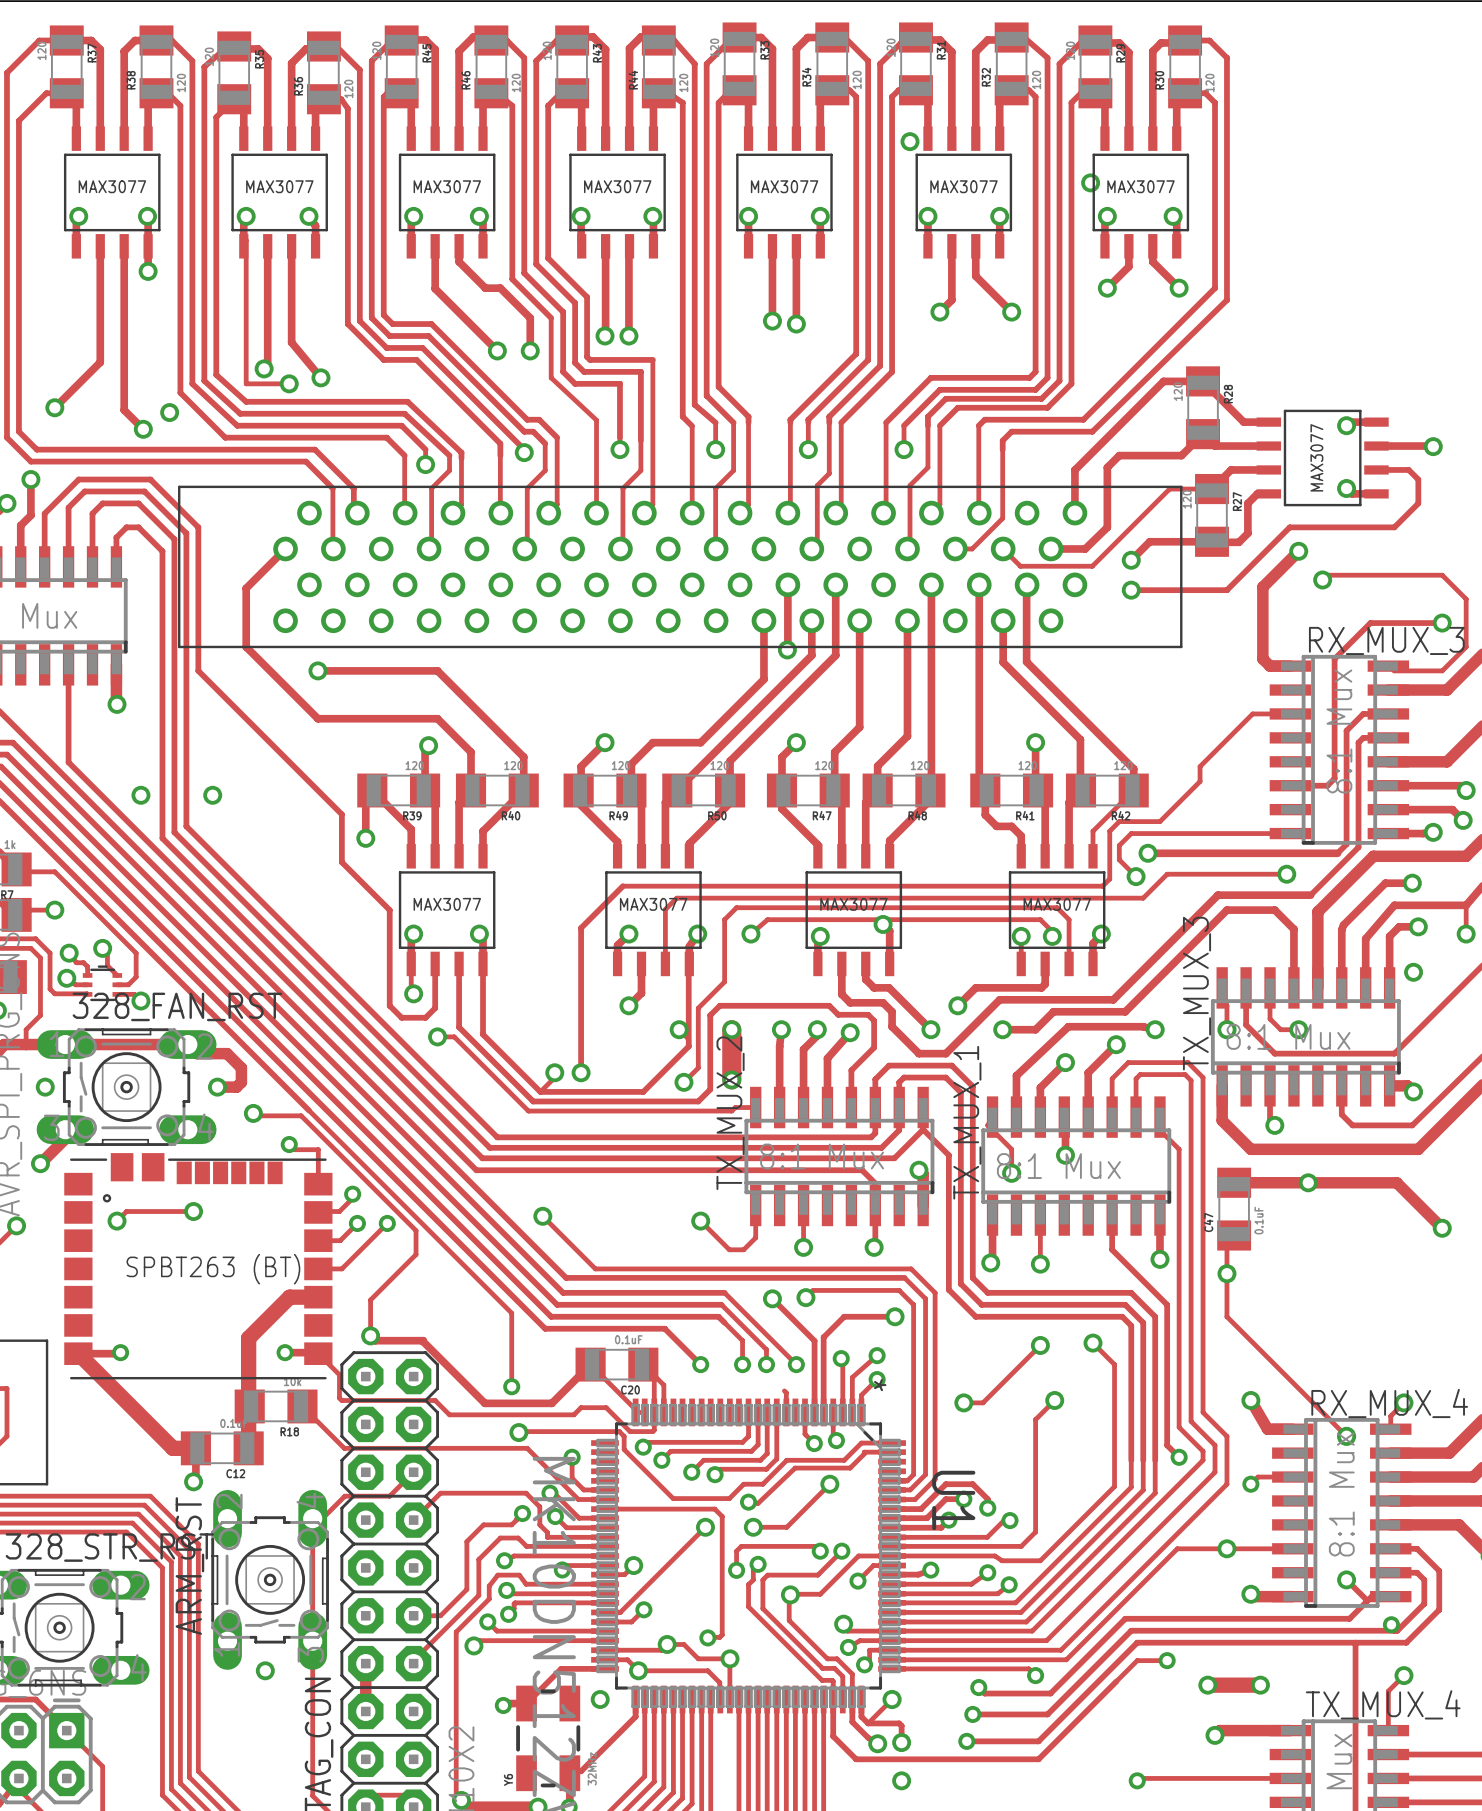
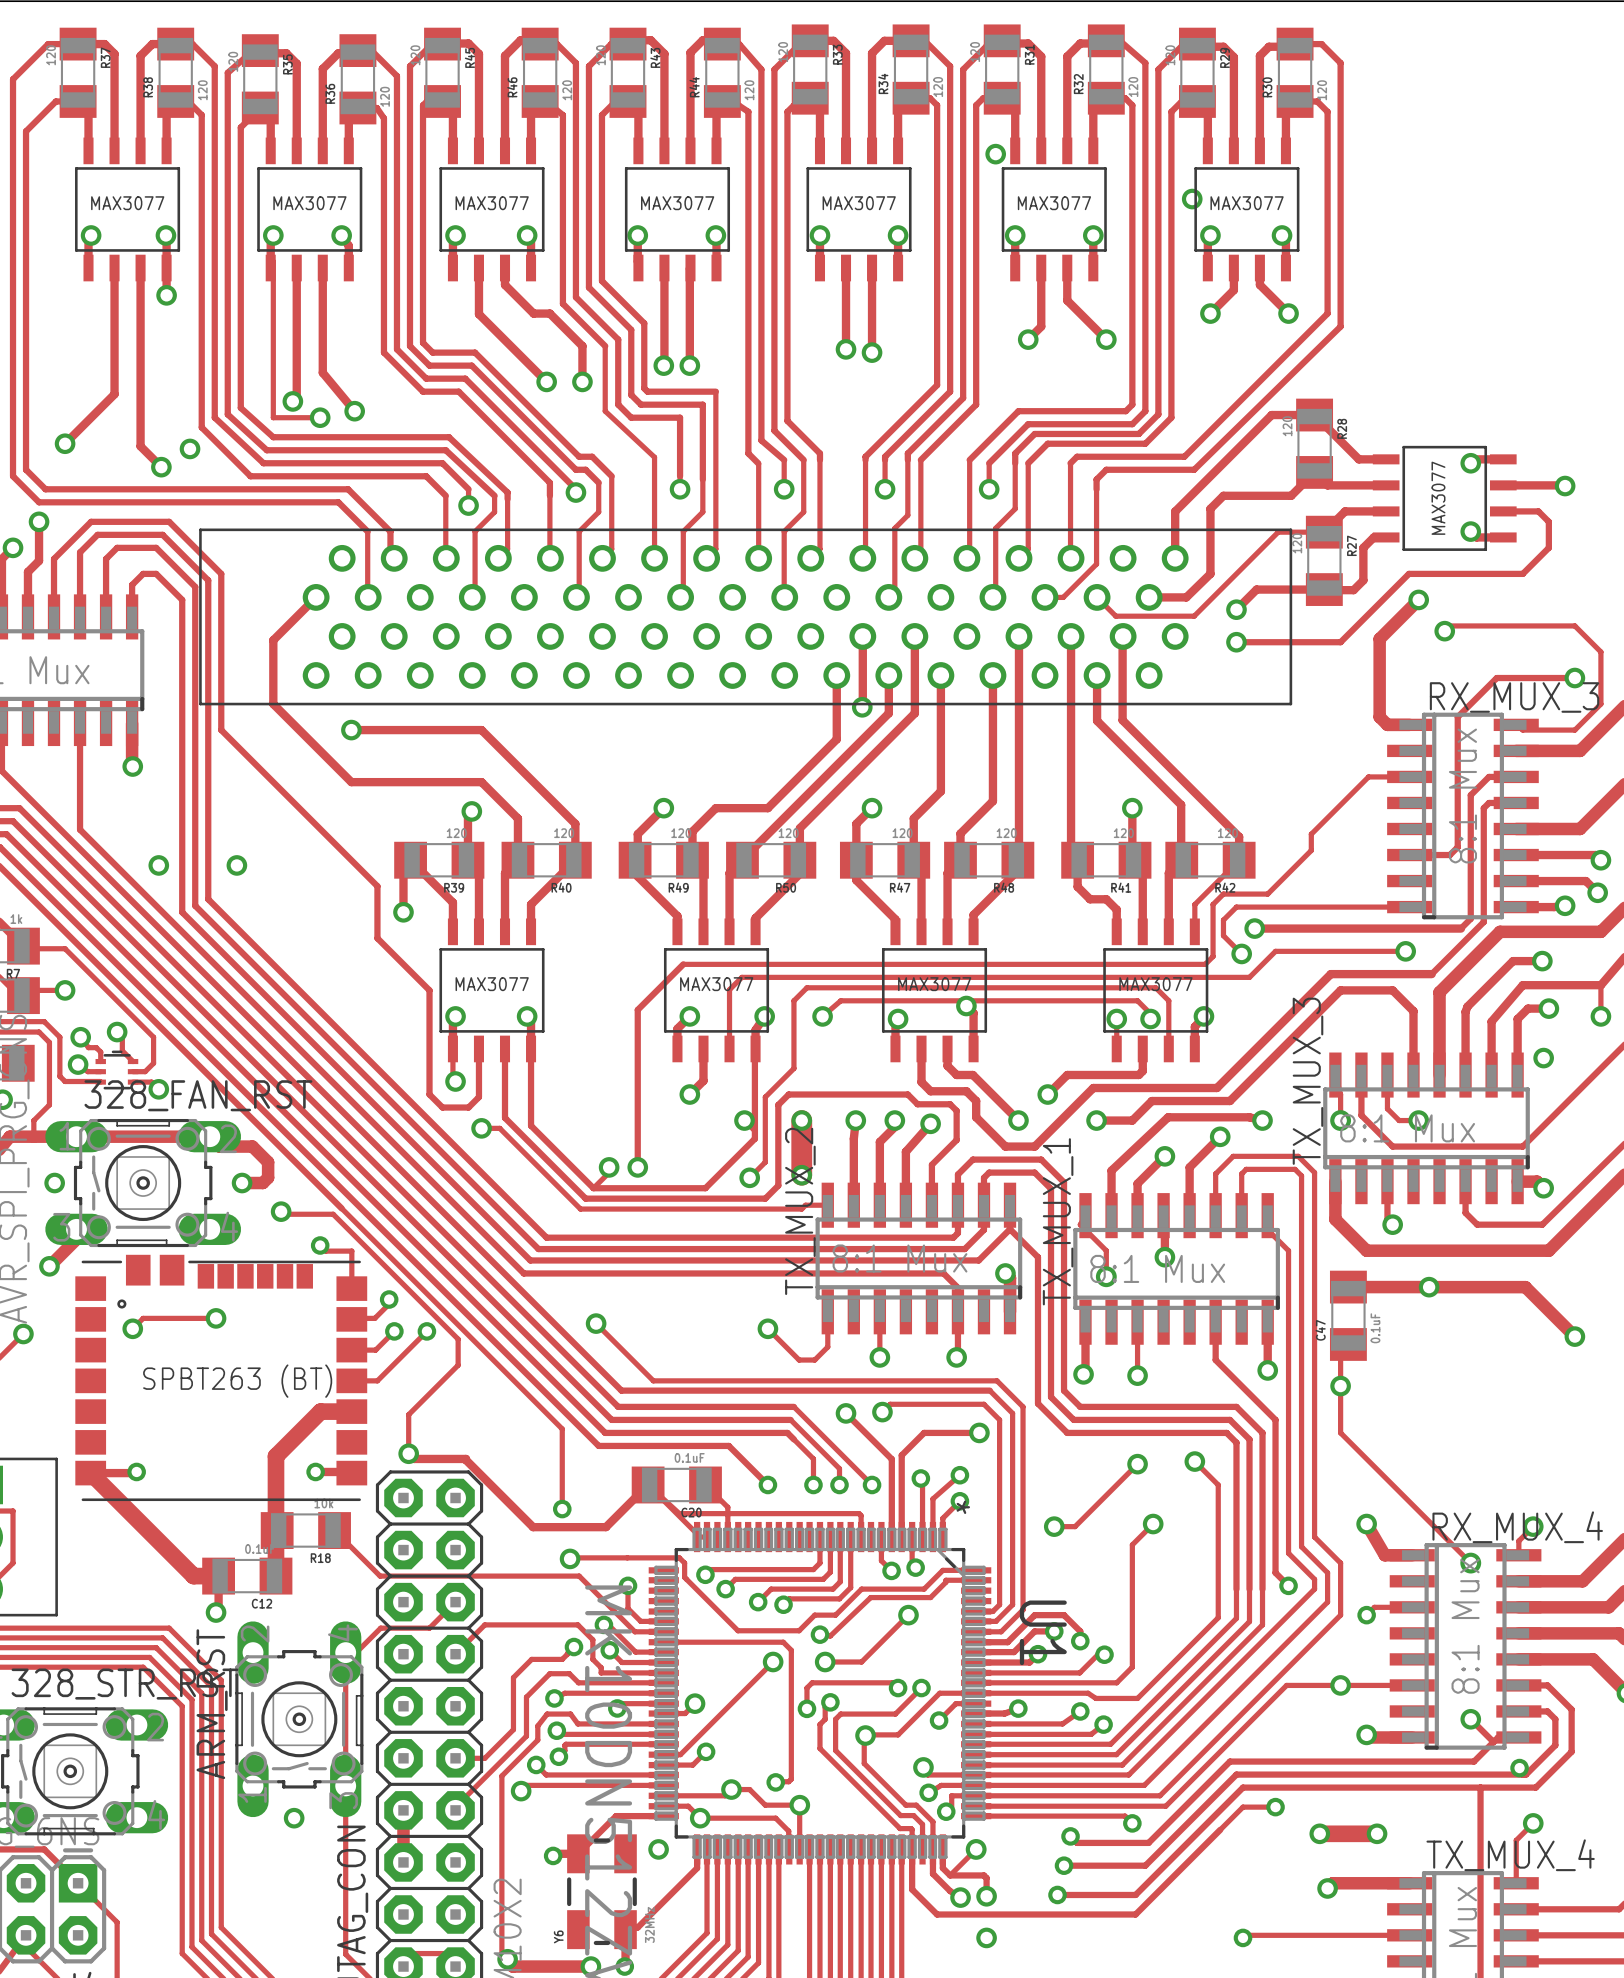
track: (318, 1353) (339, 1374) (339, 1398) (341, 1400) (435, 1400) (449, 1414) (573, 1414) (581, 1407) (606, 1407) (630, 1431) (654, 1430) (654, 1375) -> none
track: none -> (648, 1484) (679, 1513) (859, 1513)

